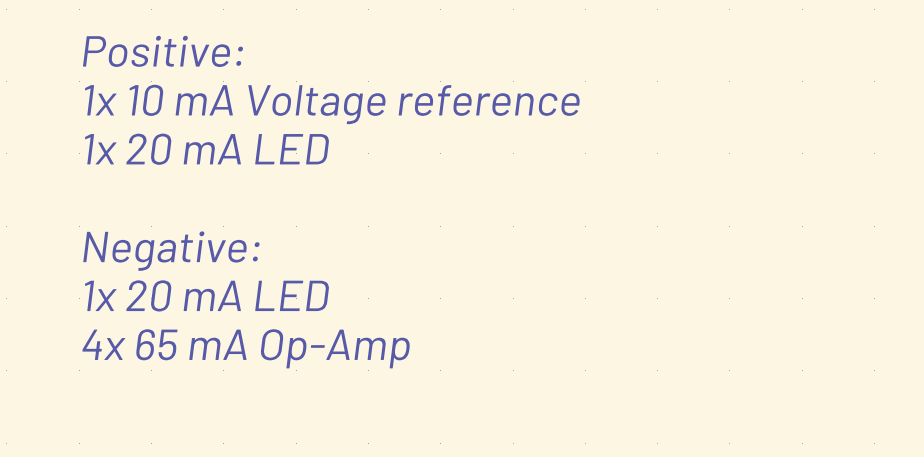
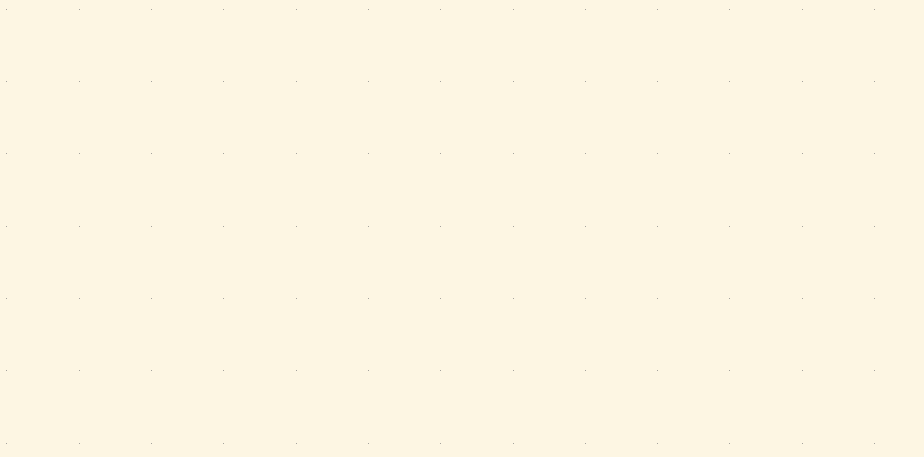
text: Positive: (163, 51) -> none
text: 1x 10 mA Voltage reference (332, 104) -> none
text: 1x 20 mA LED (207, 149) -> none
text: Negative: (171, 251) -> none
text: 1x 20 mA LED (207, 295) -> none
text: 4x 65 mA Op-Amp (246, 348) -> none

